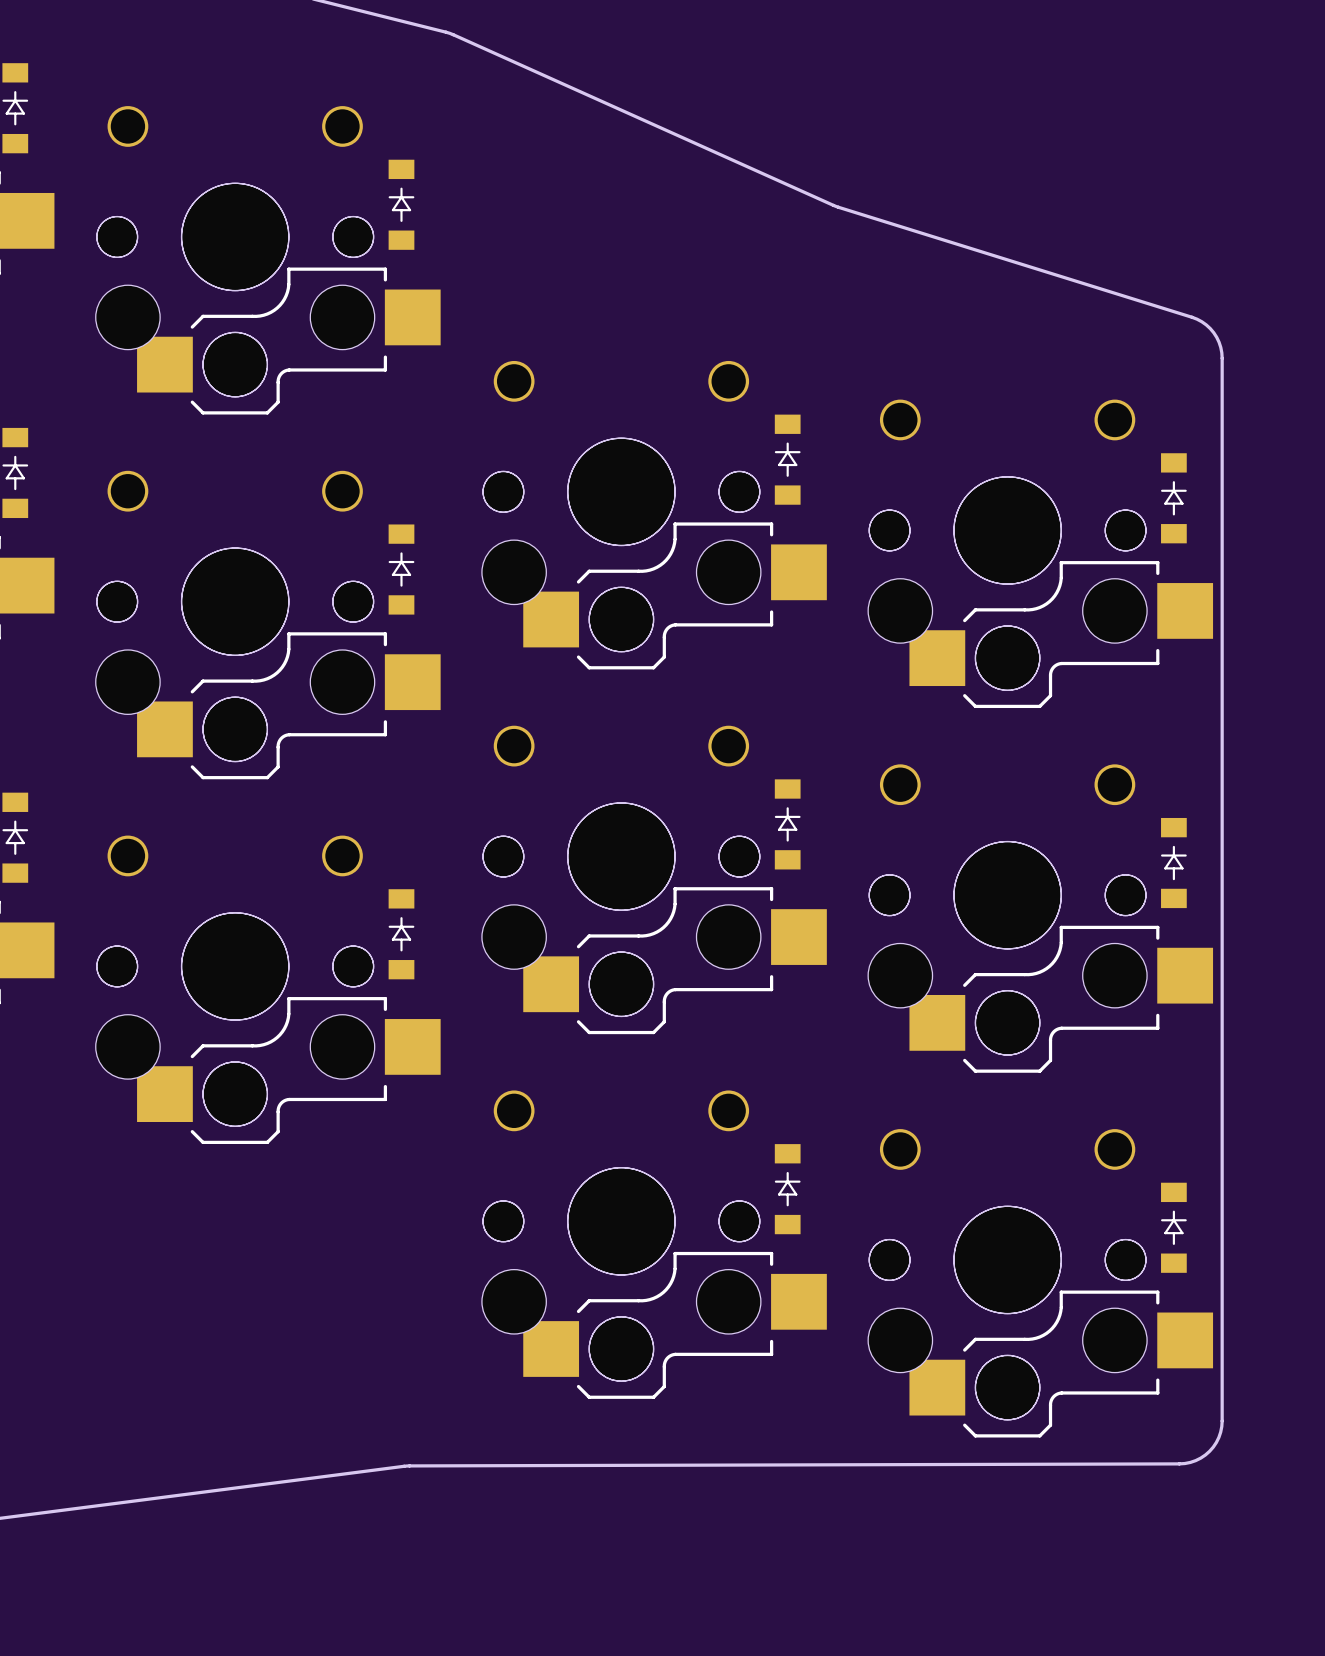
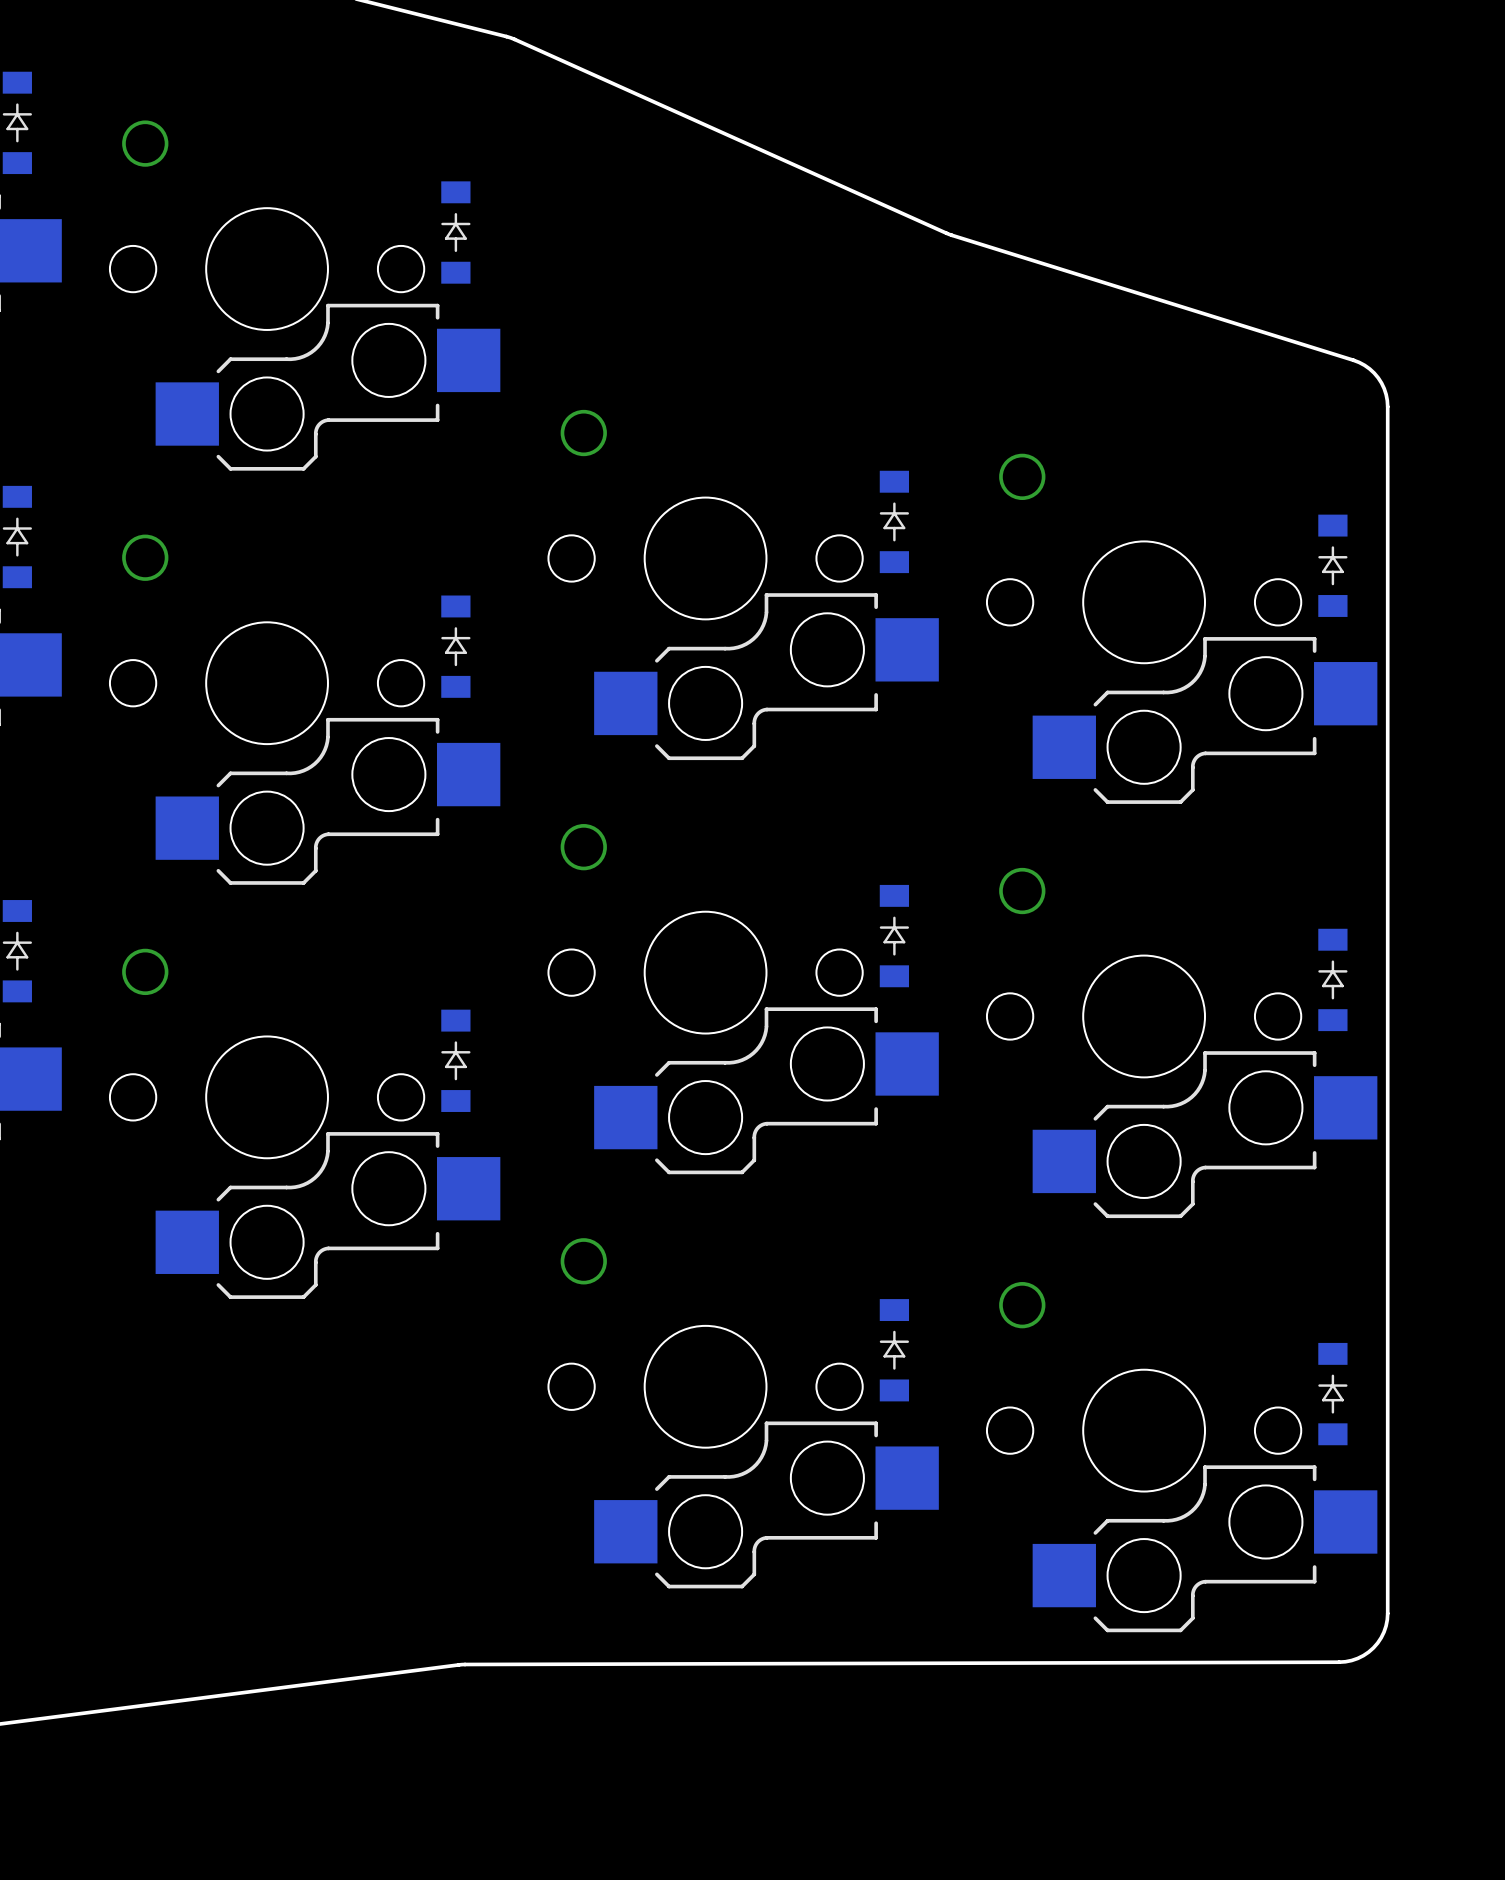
part: (234, 251) -> none
part: (620, 506) -> none
part: (1007, 544) -> none
part: (234, 616) -> none
part: (620, 871) -> none
part: (1007, 909) -> none
part: (234, 980) -> none
part: (620, 1235) -> none
part: (1007, 1274) -> none

